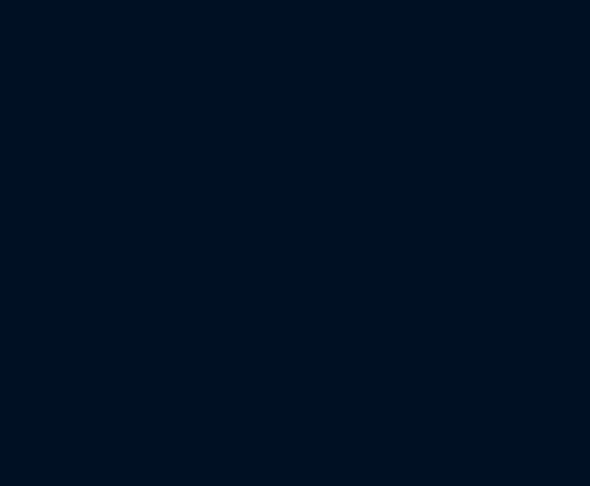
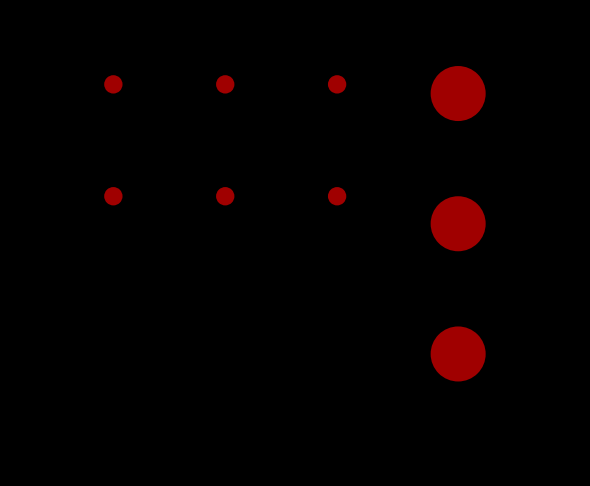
part: none -> (113, 84)
part: none -> (225, 84)
part: none -> (337, 84)
part: none -> (458, 93)
part: none -> (113, 196)
part: none -> (225, 196)
part: none -> (337, 196)
part: none -> (458, 223)
part: none -> (458, 353)

